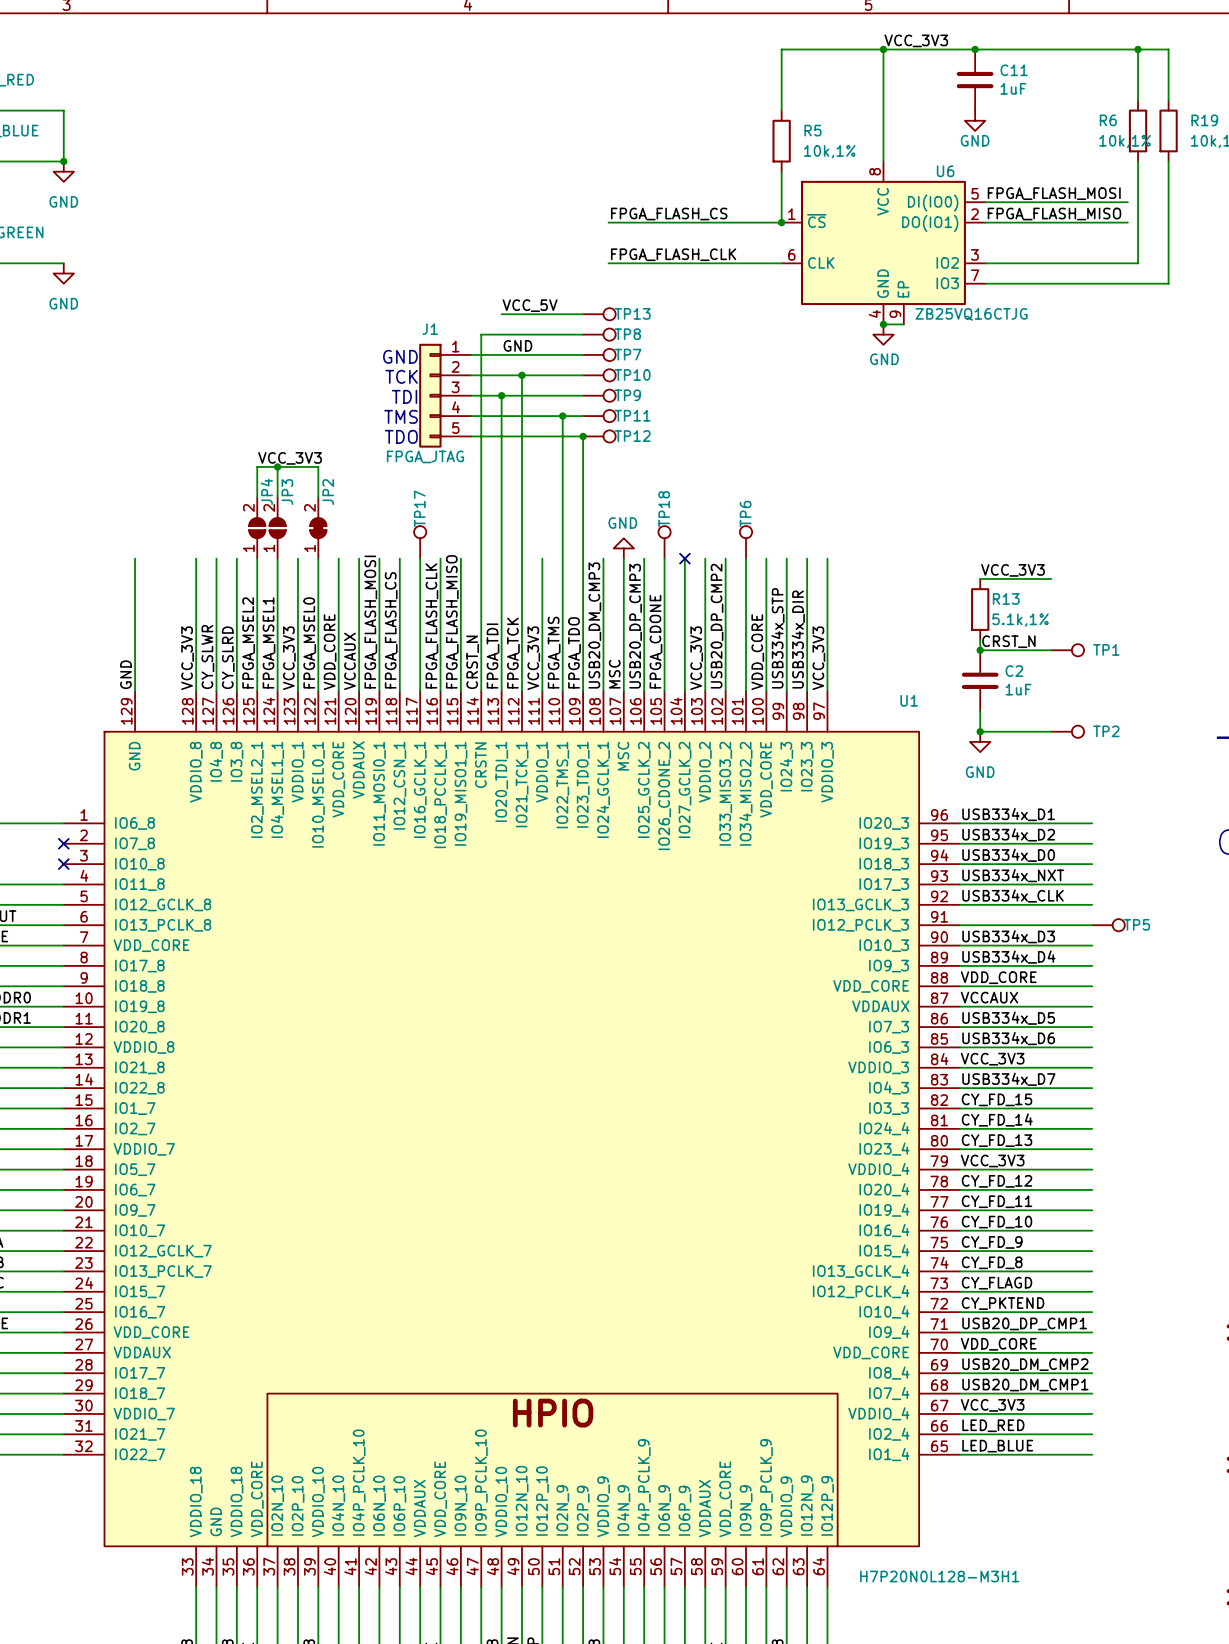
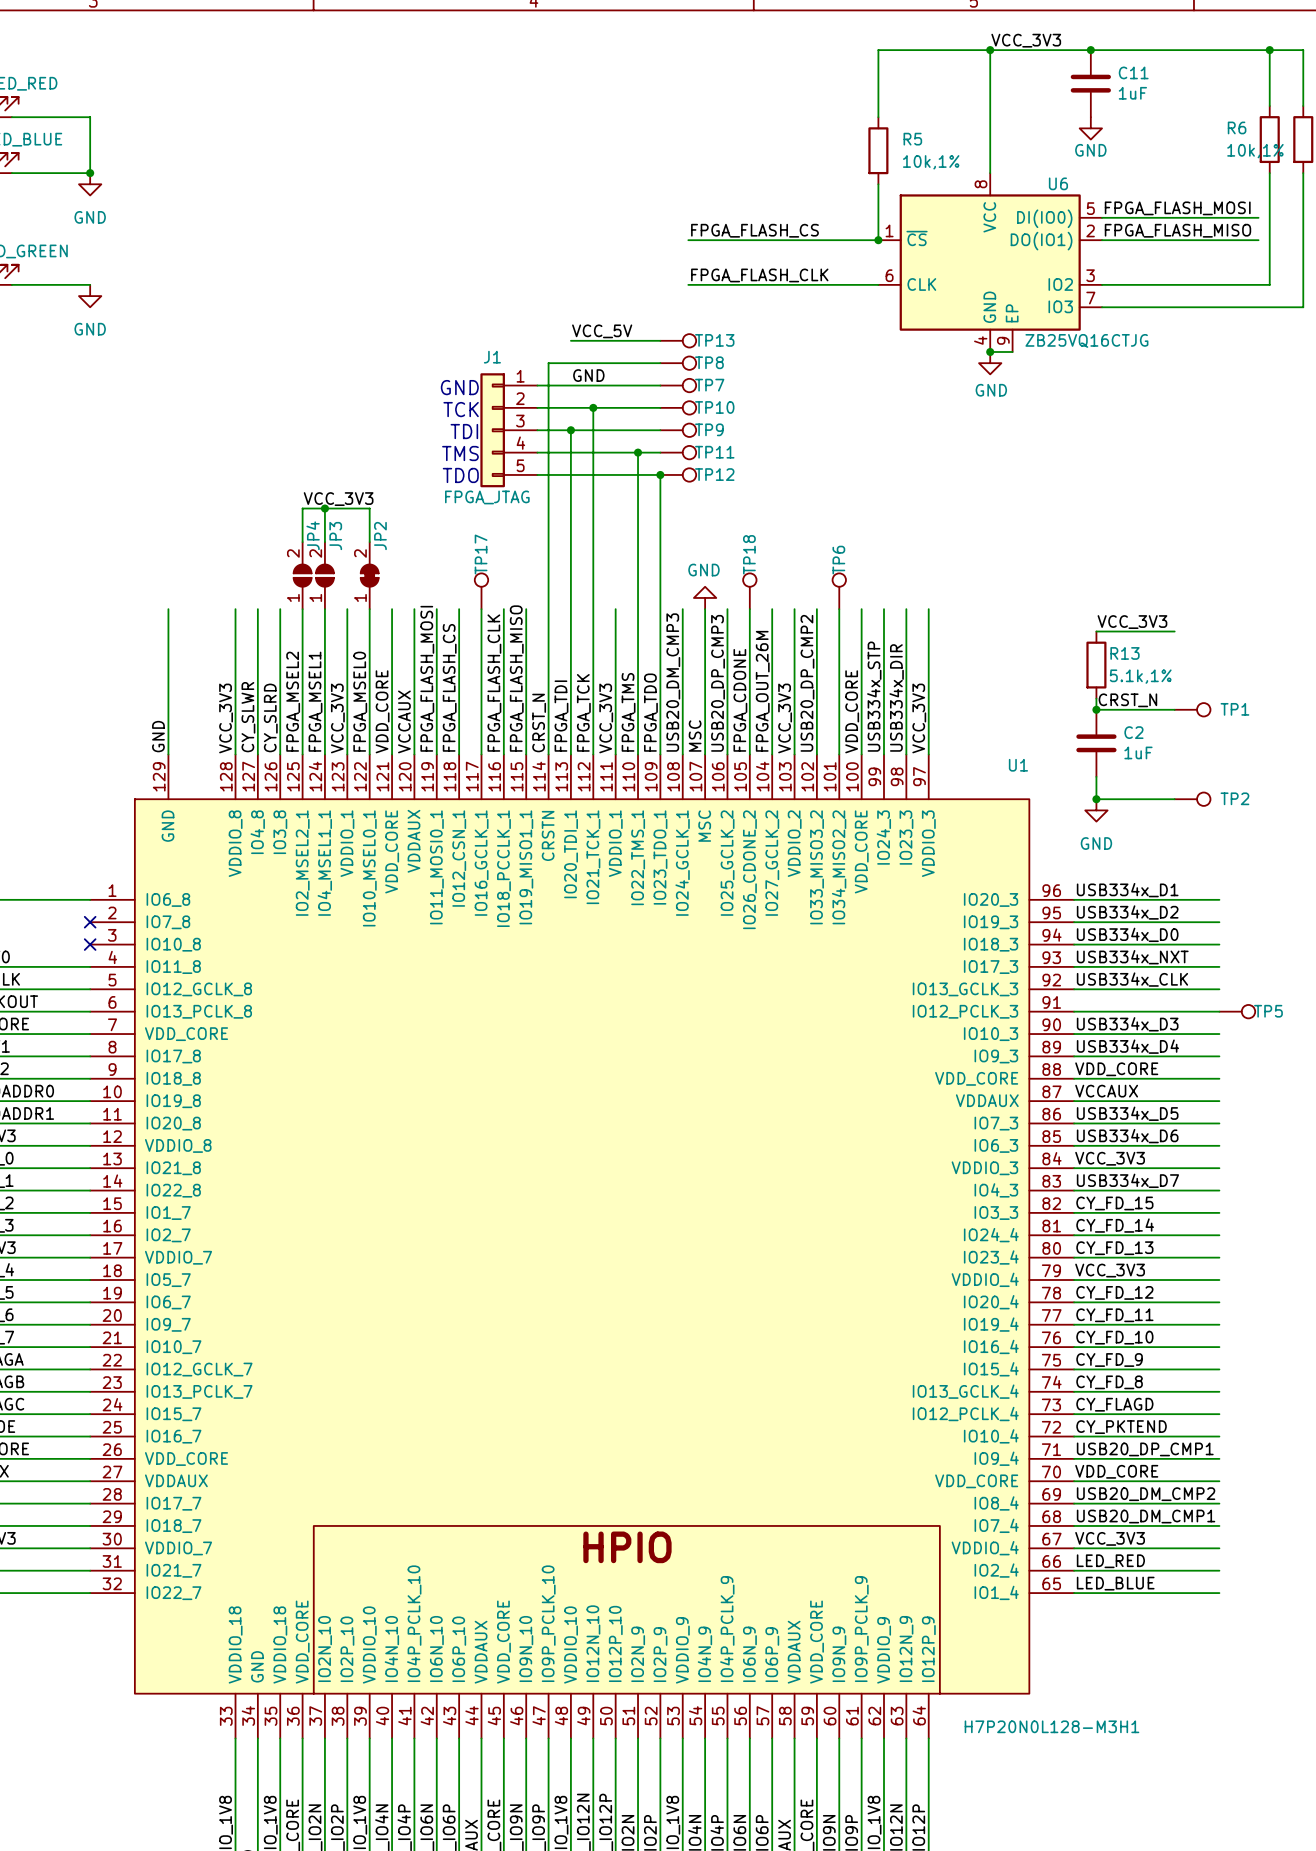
no-connect mark: (684, 558) -> none
label: none -> FPGA_OUT_26M (762, 691)

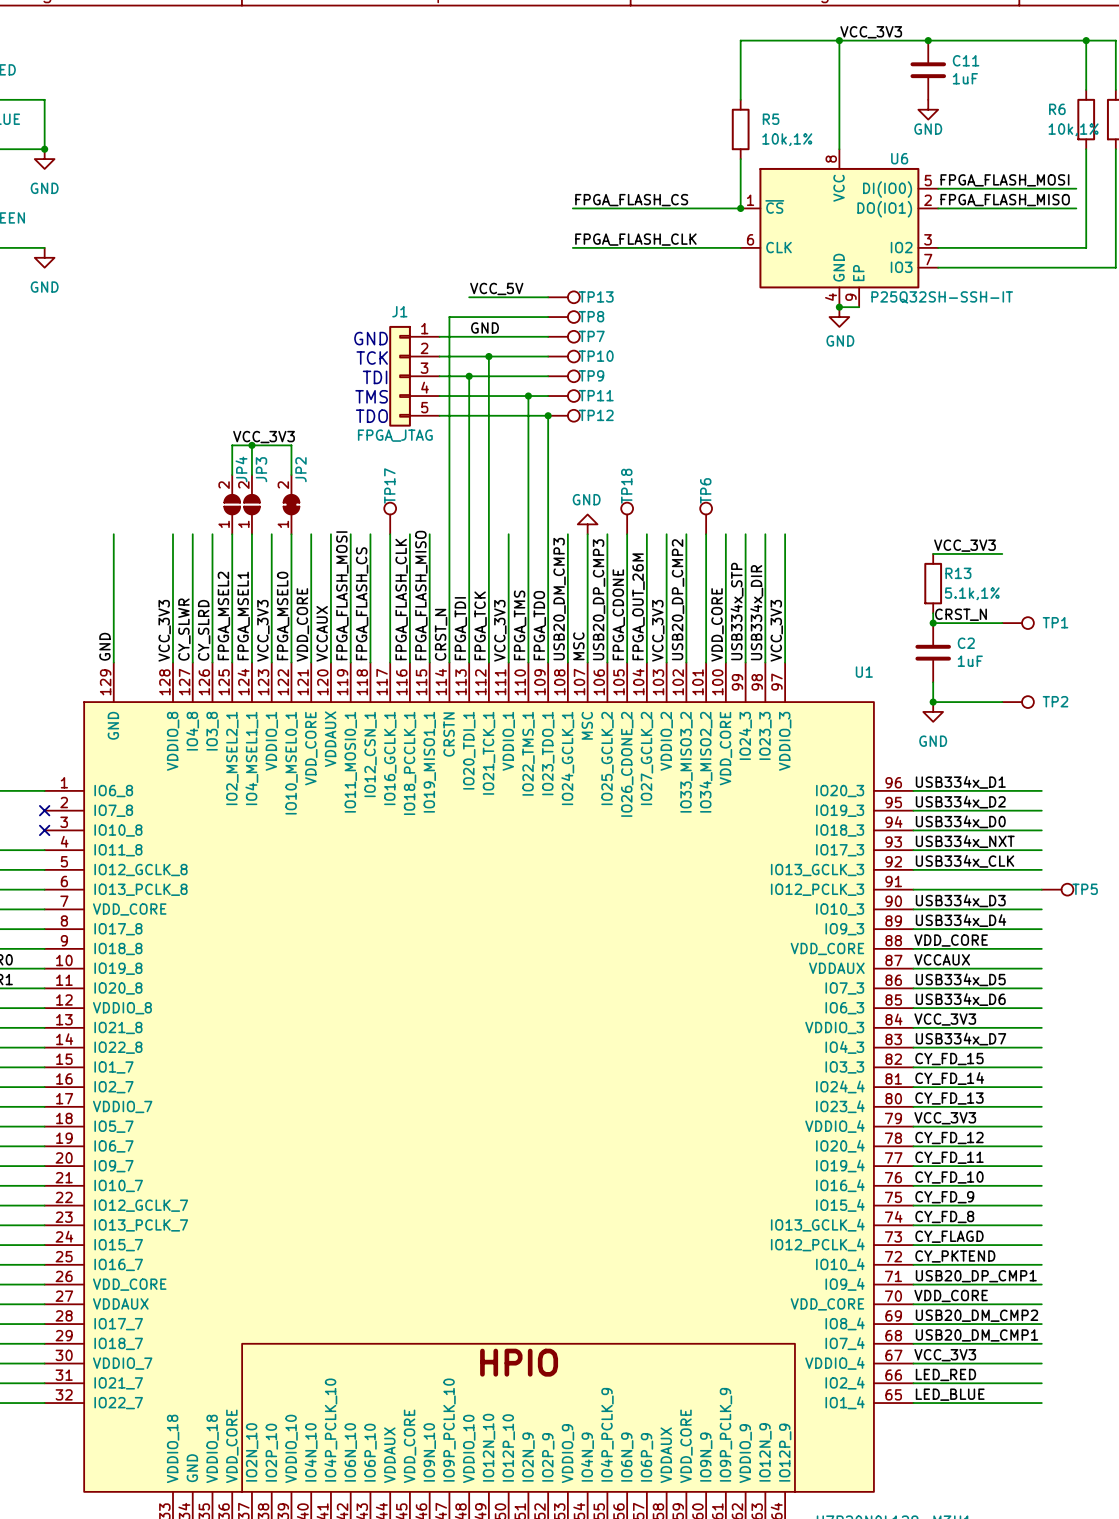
U6 value: ZB25VQ16CTJG (1086, 340) -> P25Q32SH-SSH-IT (942, 297)

